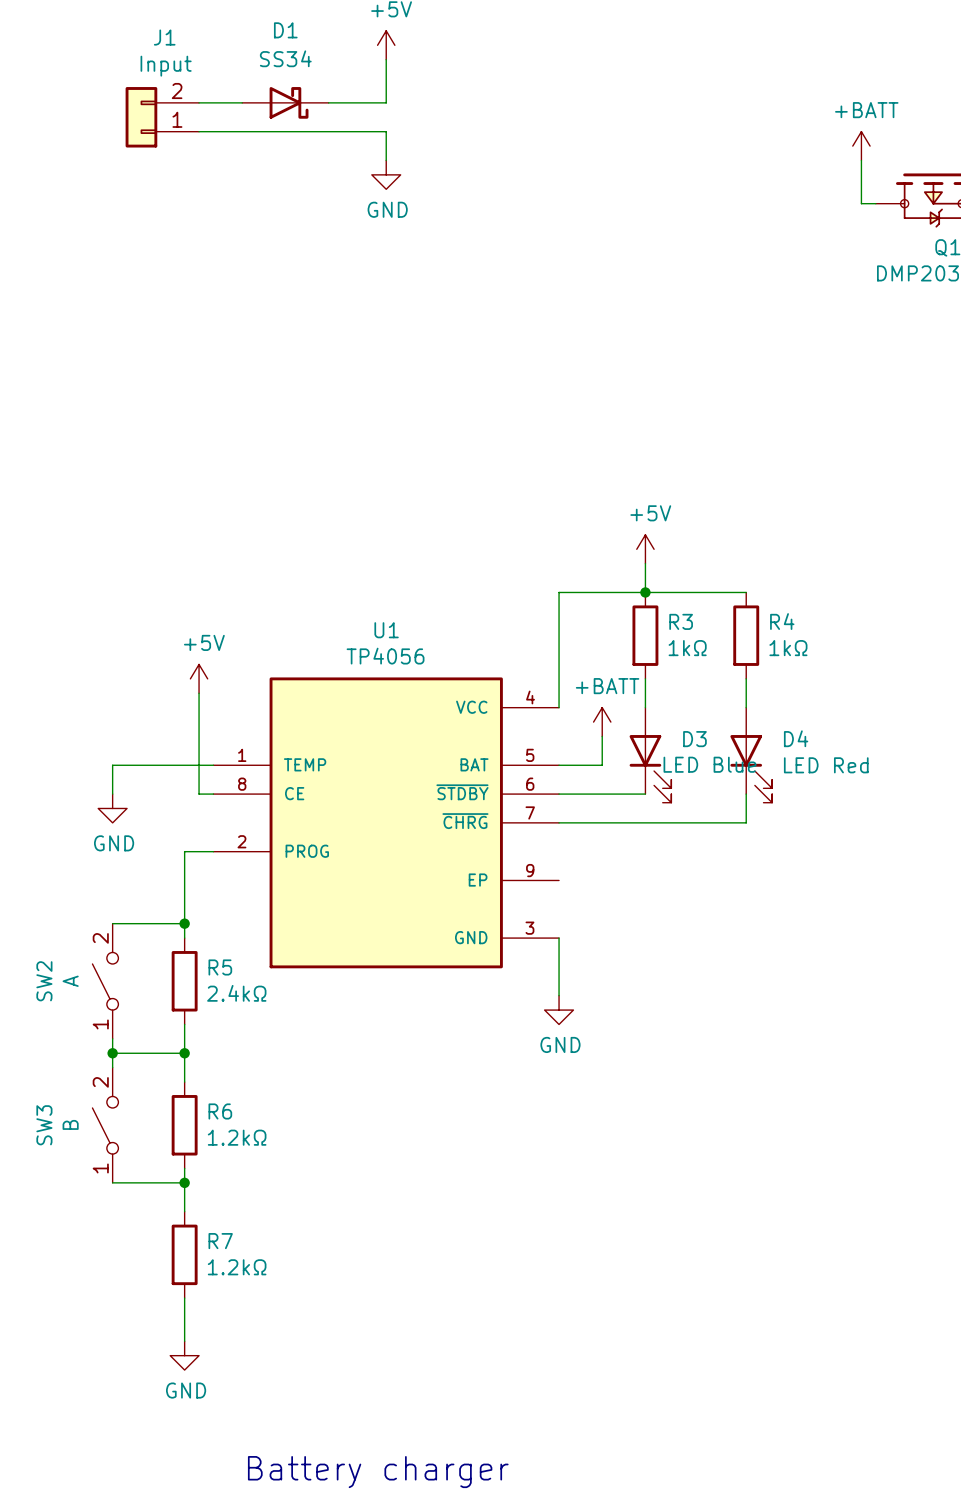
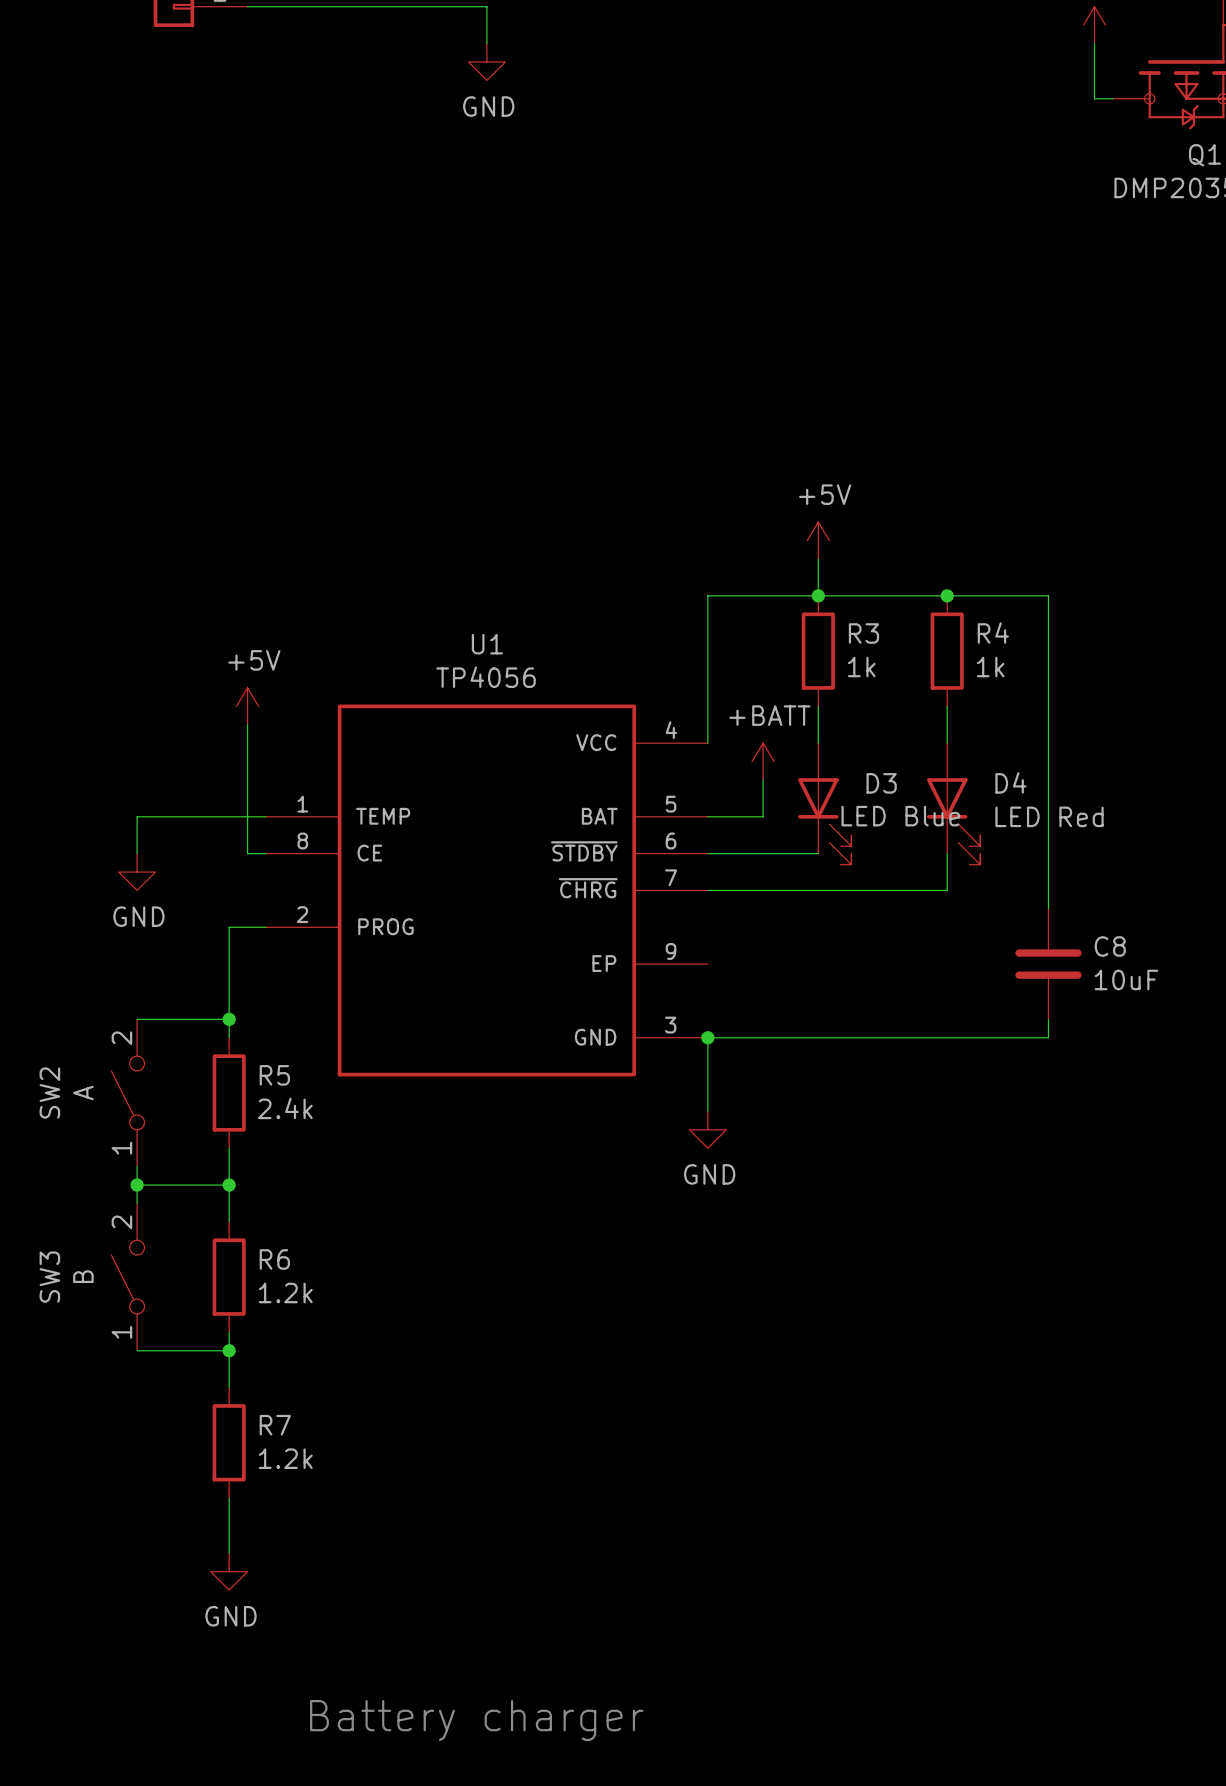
wire: none -> (947, 595) (1048, 595) (1048, 908)
junction: none -> (947, 595)
R3 value: 1kΩ (687, 648) -> 1k (861, 666)
R4 value: 1kΩ (788, 648) -> 1k (990, 666)
C8: none -> 10uF (1048, 964)
wire: none -> (1048, 1019) (1048, 1037) (707, 1037)
junction: none -> (707, 1037)
R5 value: 2.4kΩ (236, 993) -> 2.4k (285, 1108)
R6 value: 1.2kΩ (237, 1137) -> 1.2k (285, 1292)
R7 value: 1.2kΩ (237, 1267) -> 1.2k (285, 1458)

